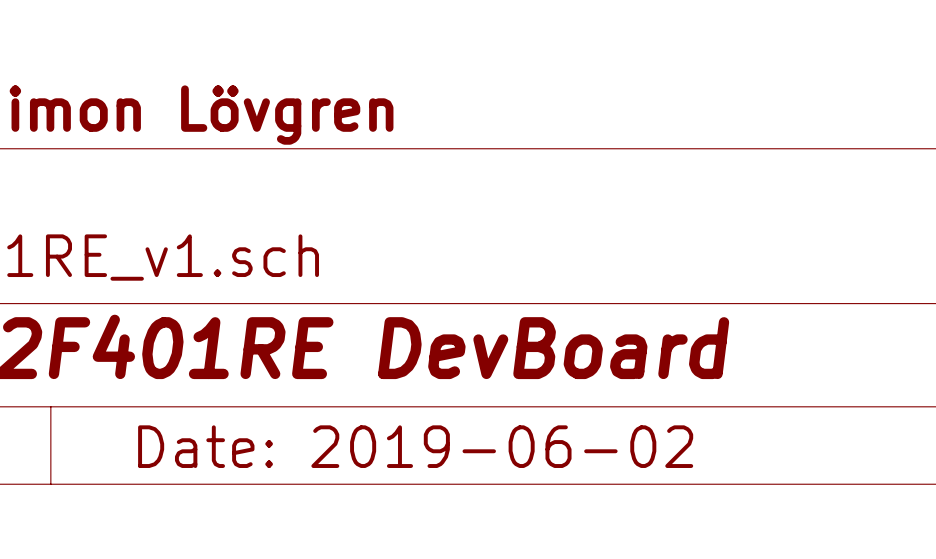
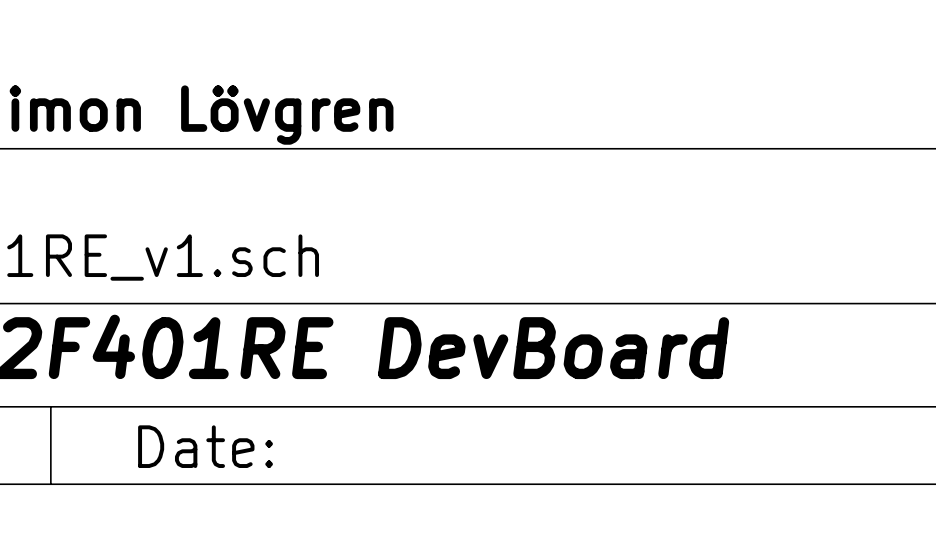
title block: Date: 2019-06-02 (415, 446) -> Date: (205, 446)

